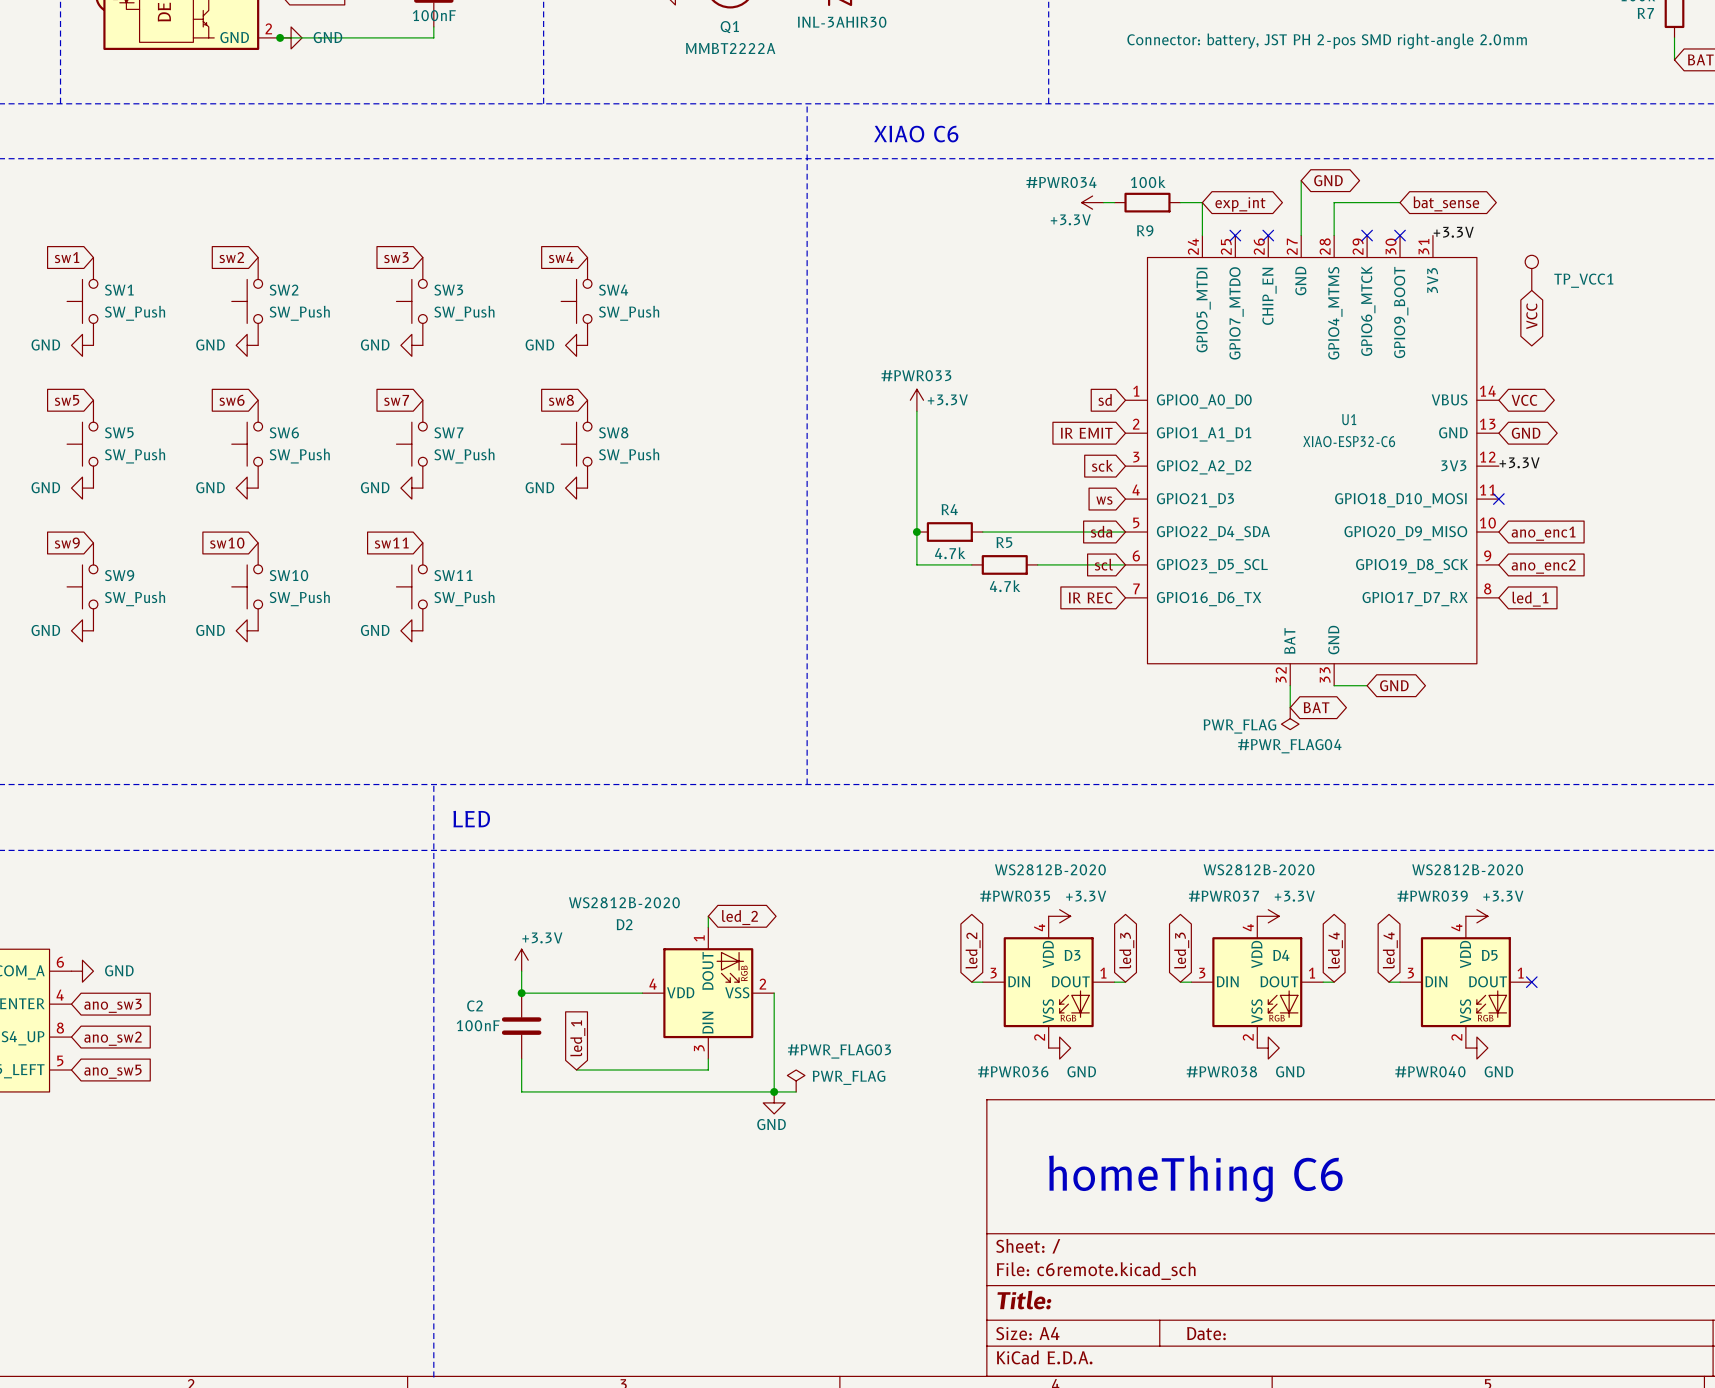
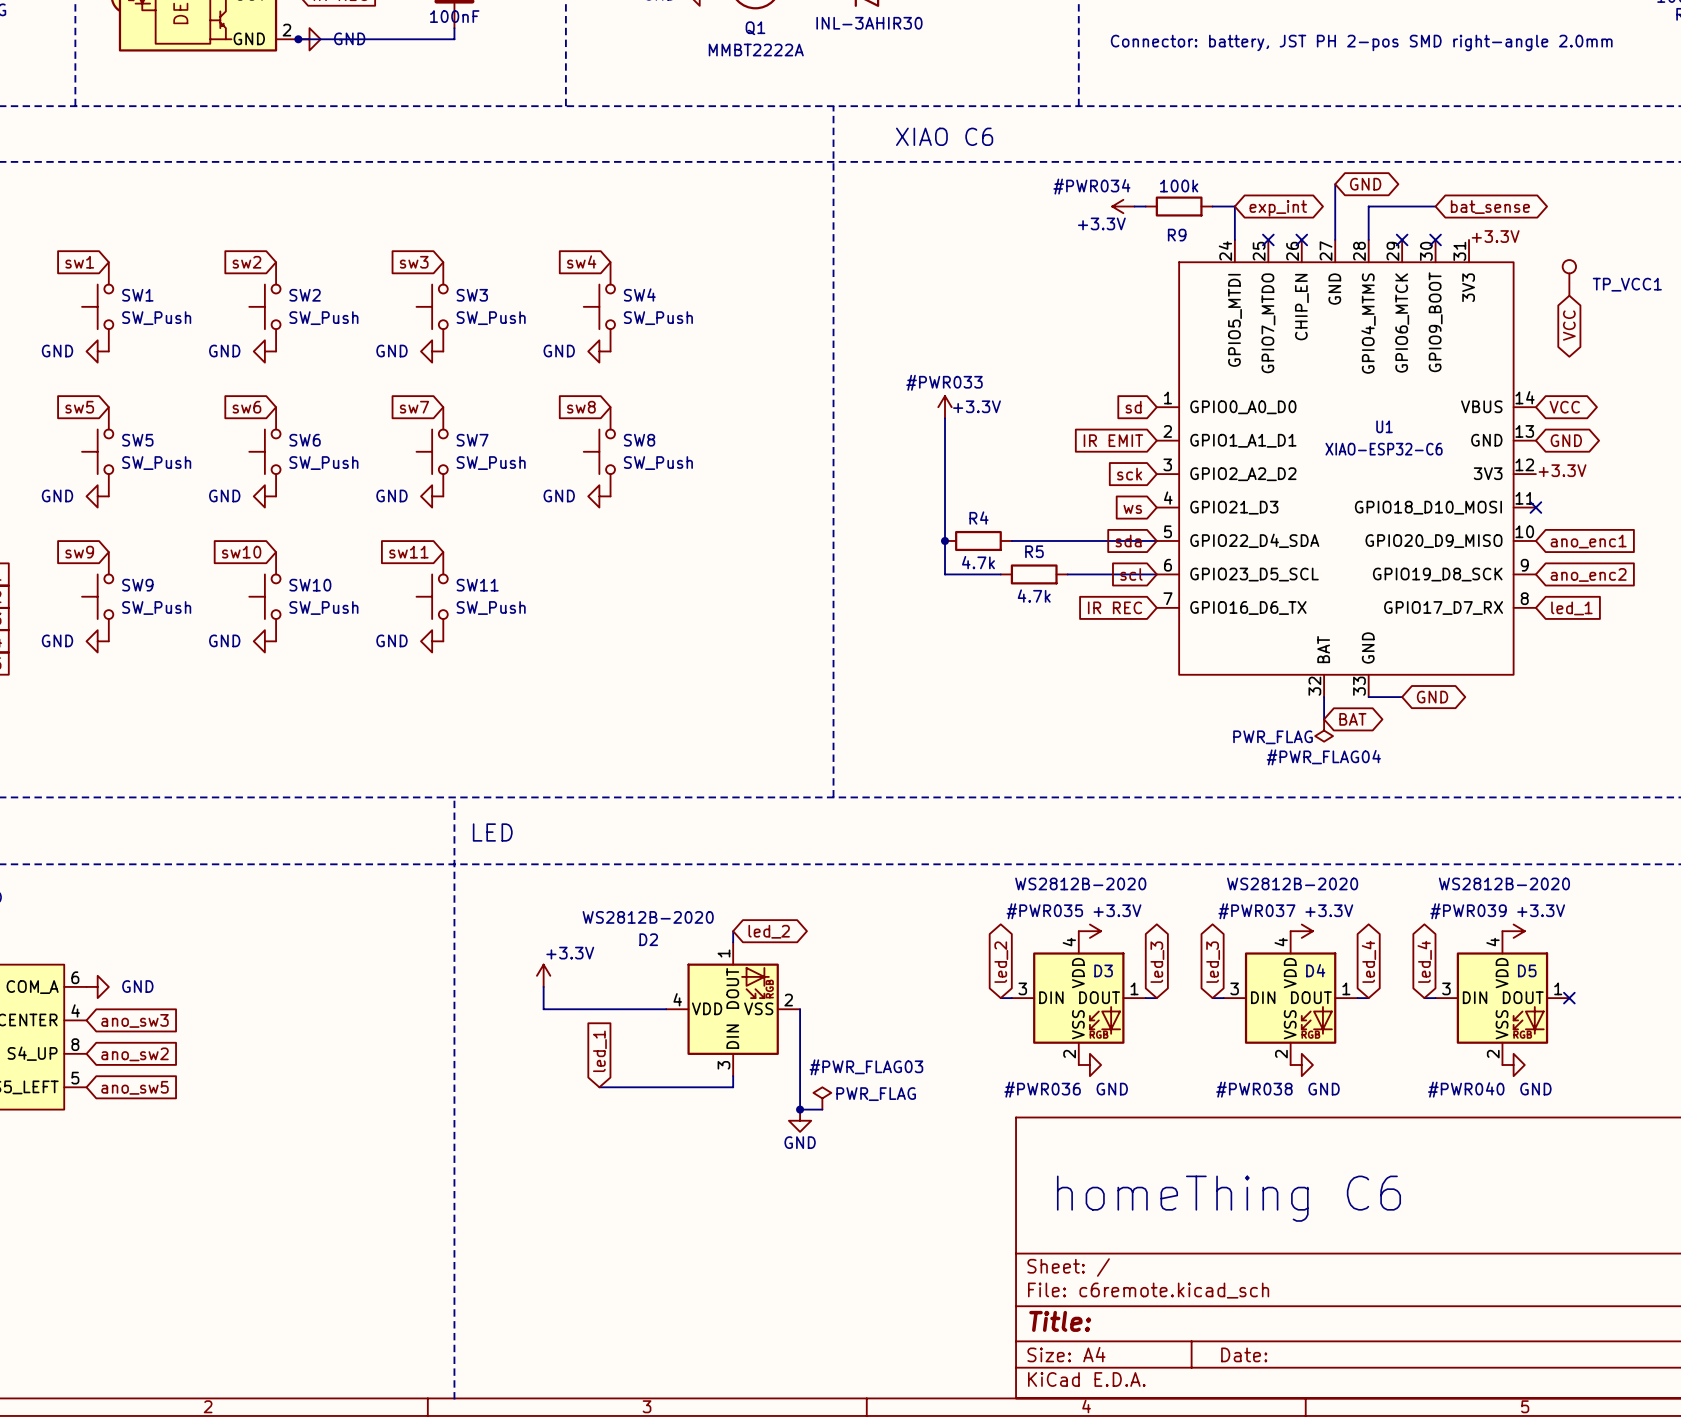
junction: (521, 993) -> none
C2: 100nF (521, 1026) -> none
wire: (521, 1059) (521, 1091) (774, 1091) -> none

